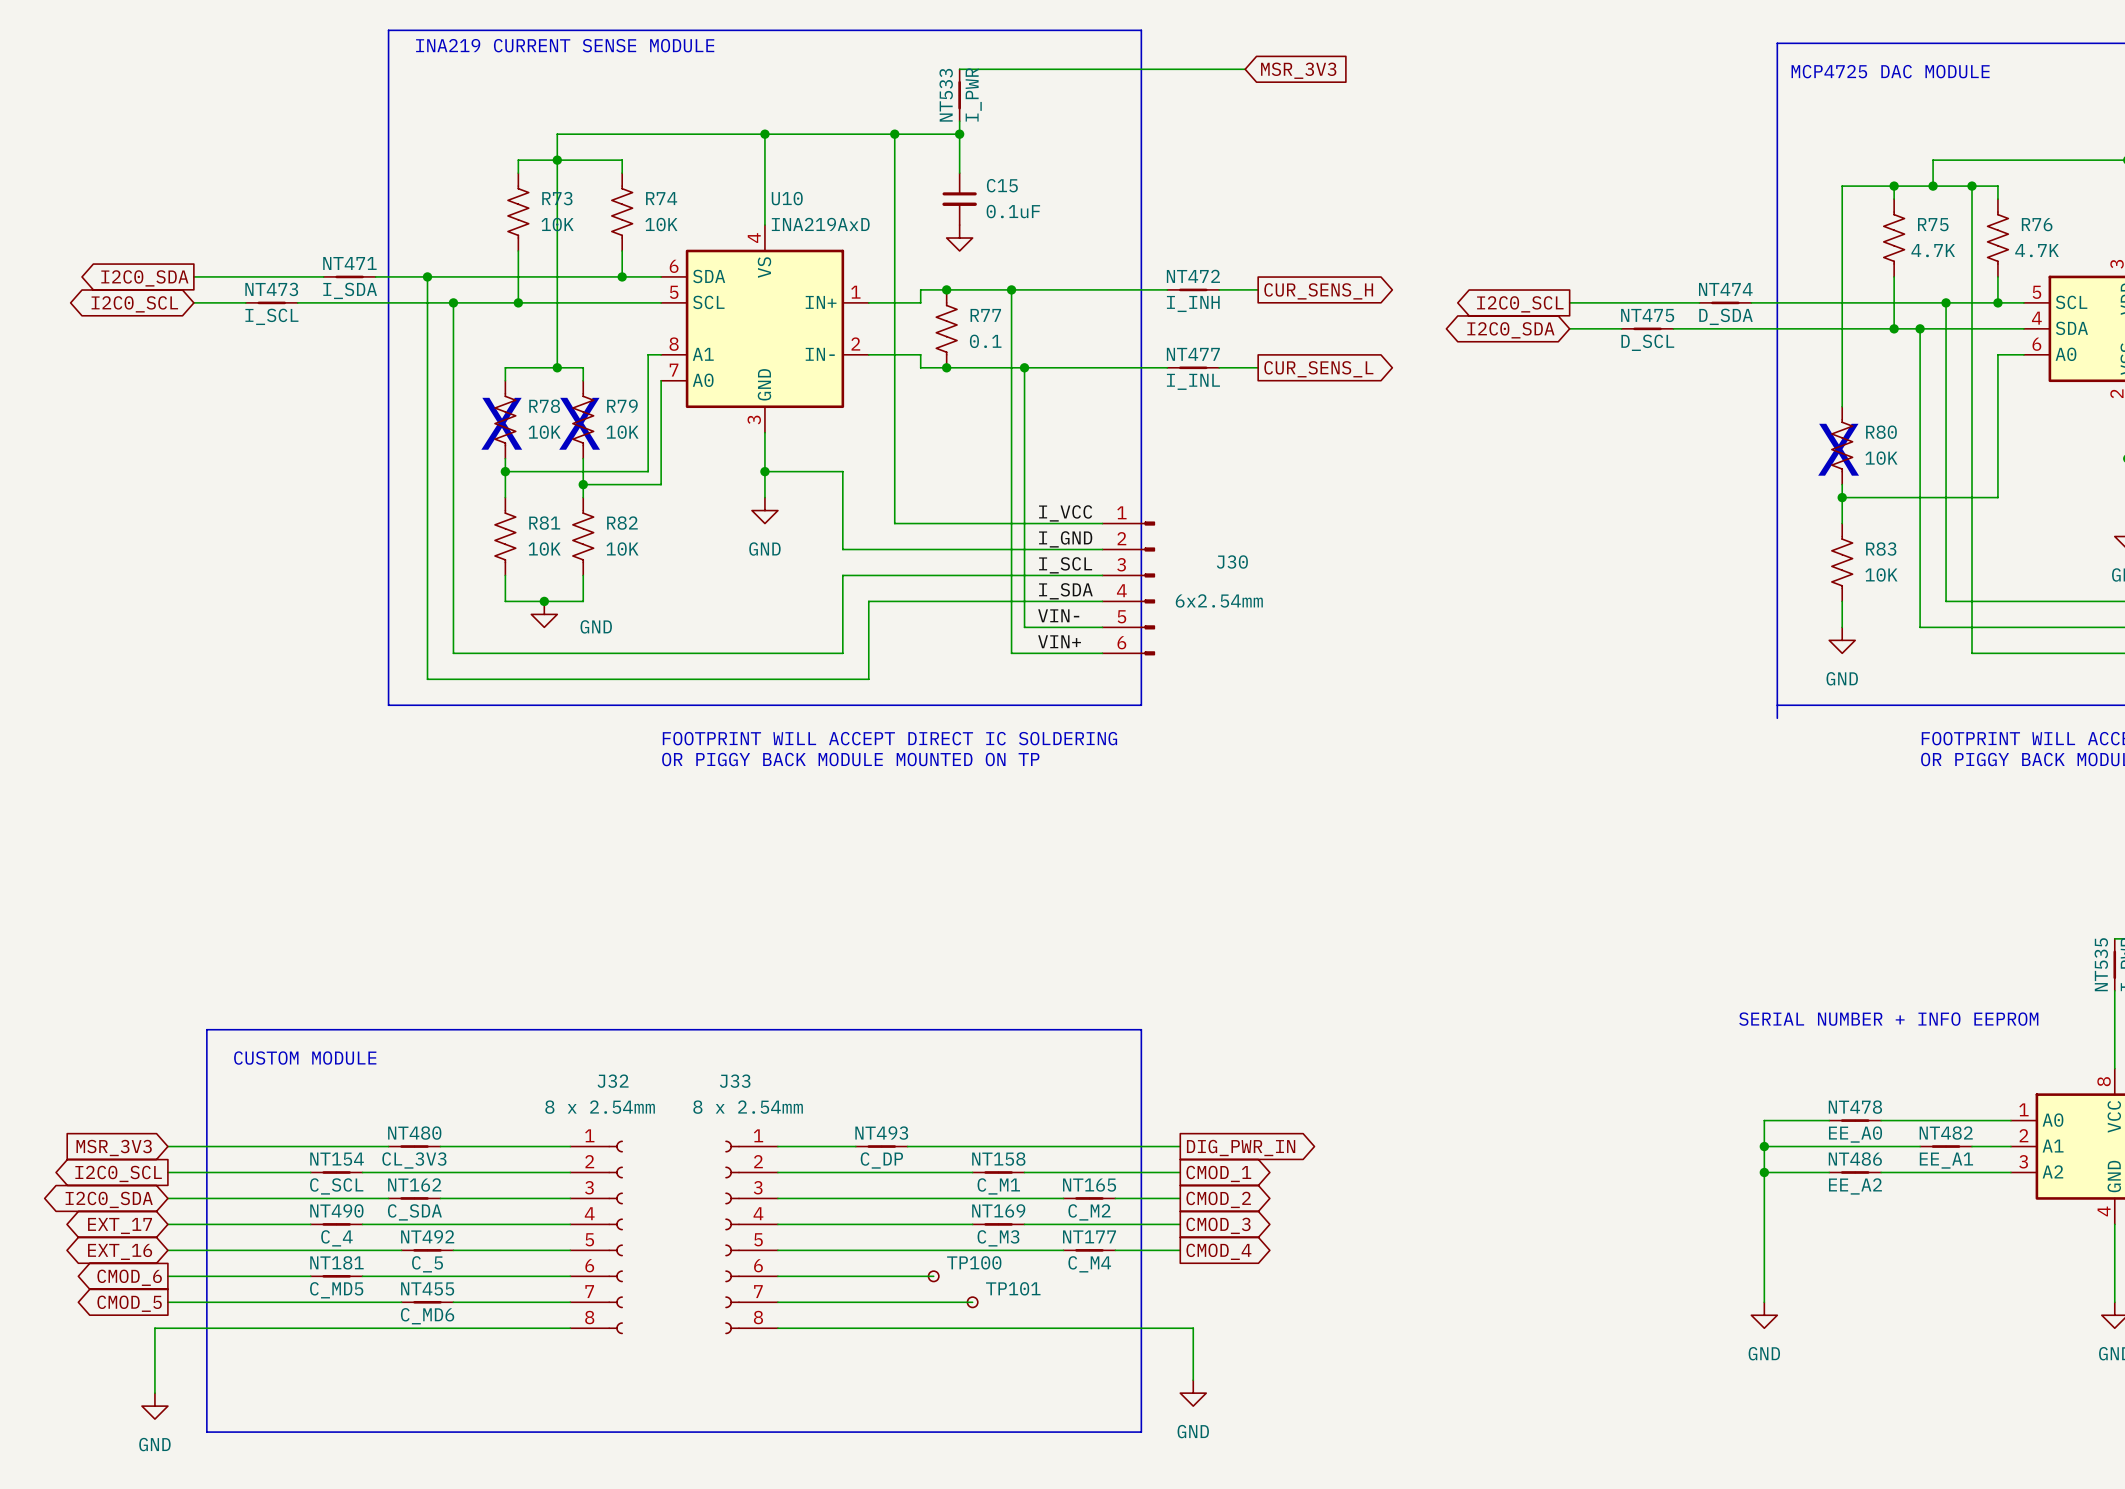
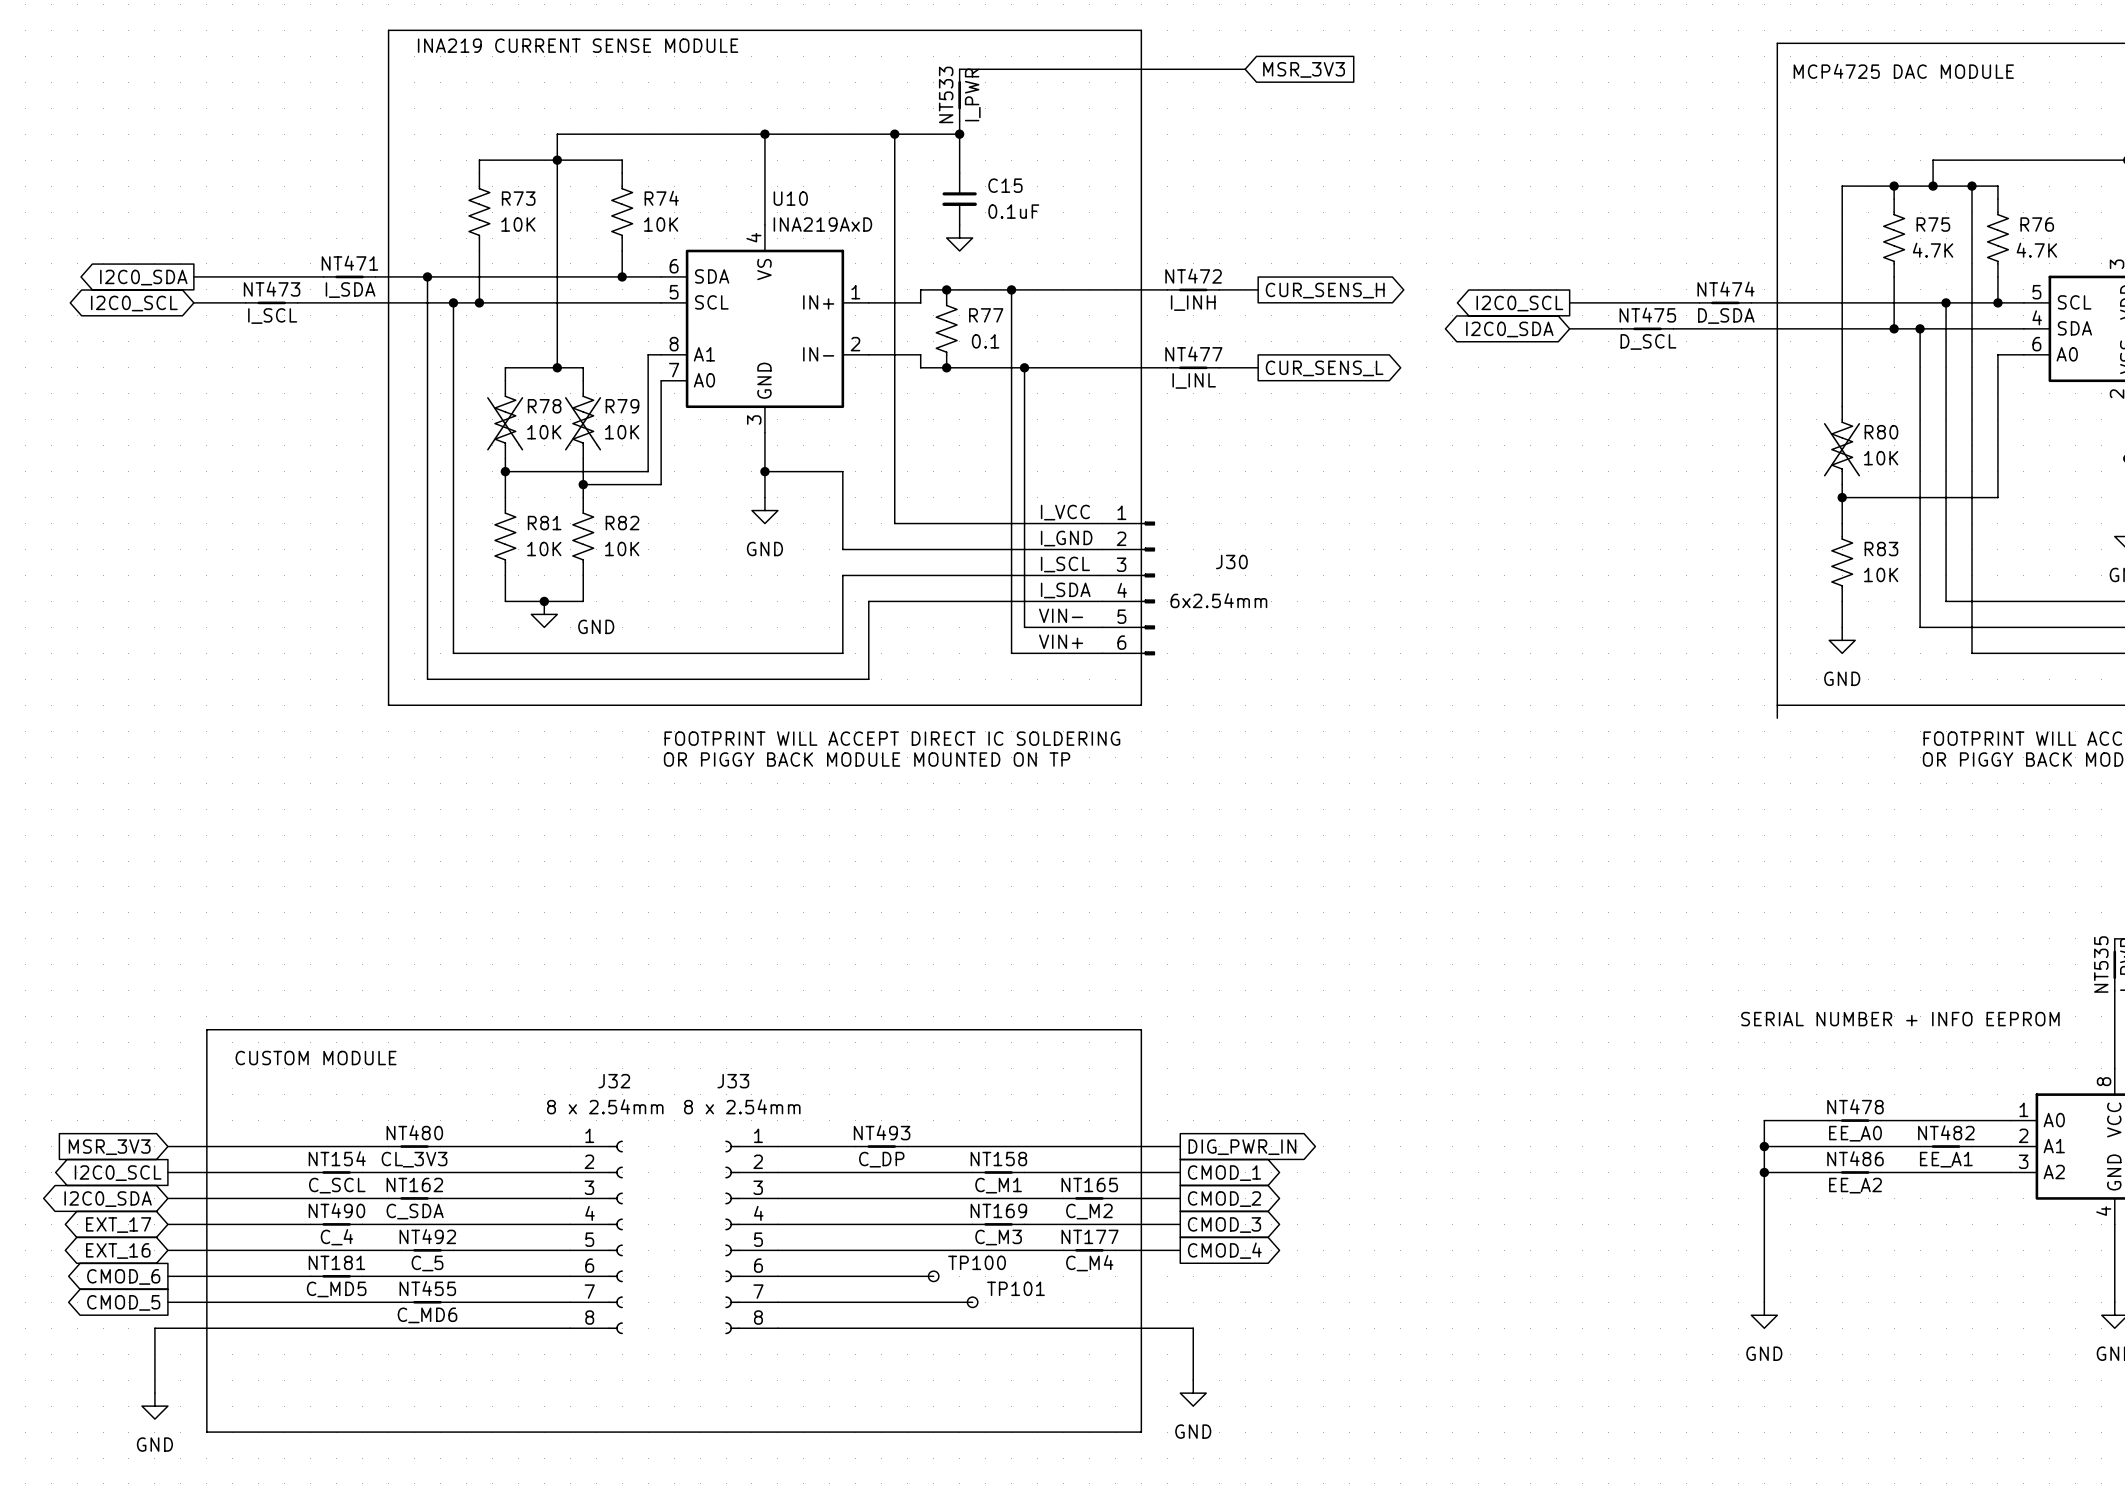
wire: (518, 160) (518, 173) -> (518, 160) (479, 160) (479, 173)
R73 position: (518, 212) -> (479, 212)
wire: (518, 250) (518, 302) -> (479, 250) (479, 302)
junction position: (518, 302) -> (479, 302)

